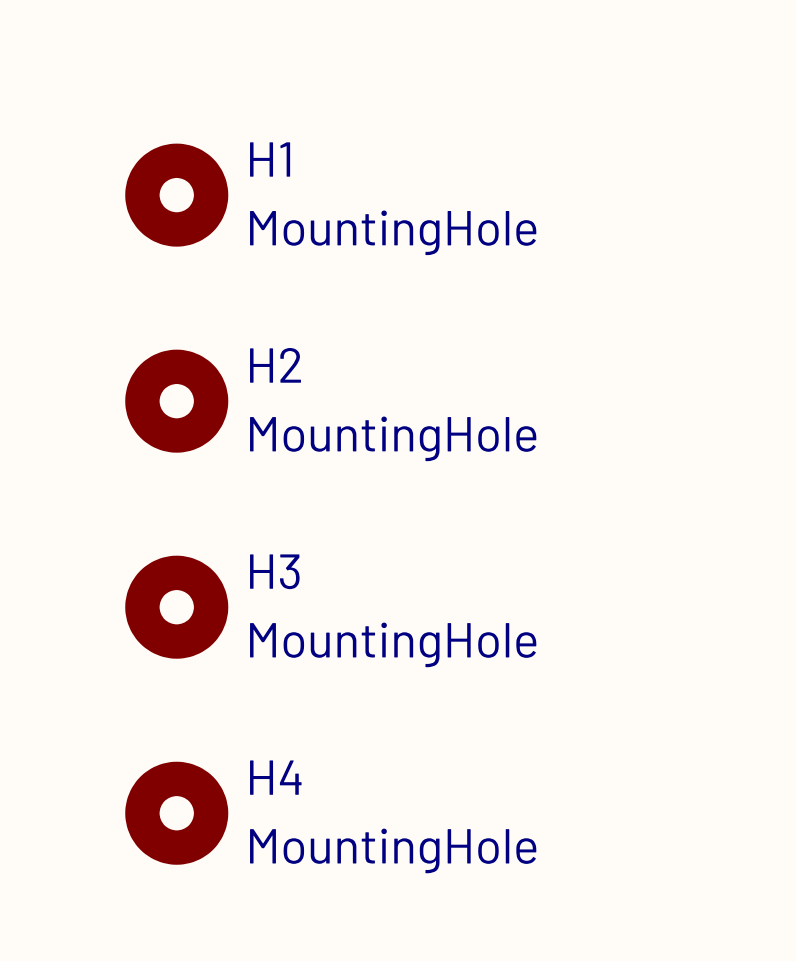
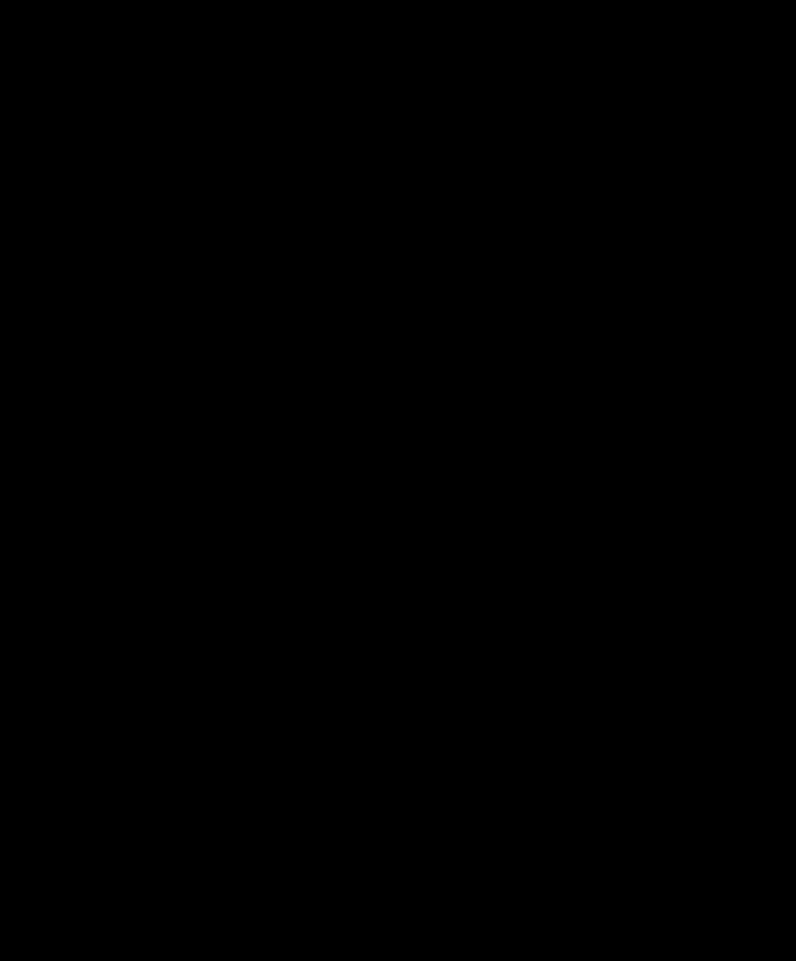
H1: MountingHole (176, 195) -> none
H2: MountingHole (176, 401) -> none
H3: MountingHole (176, 607) -> none
H4: MountingHole (176, 813) -> none

